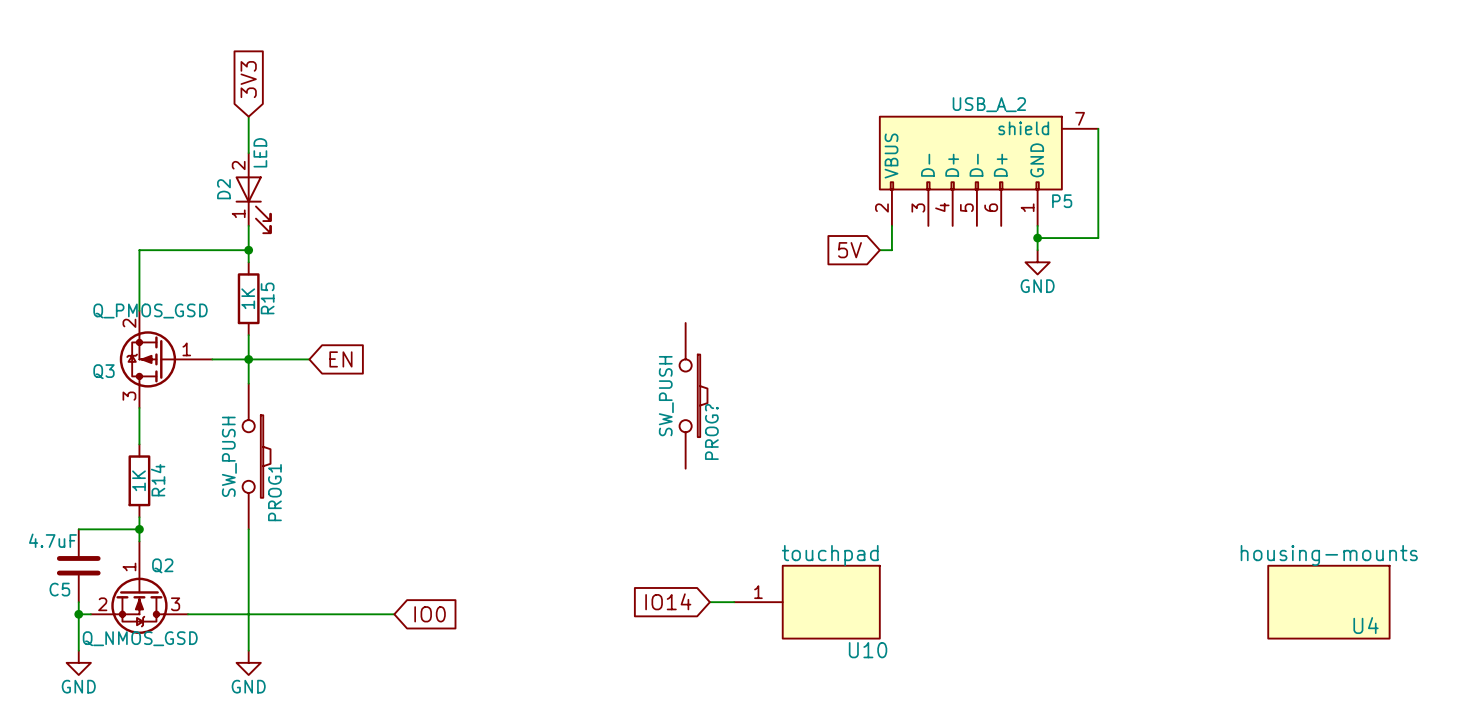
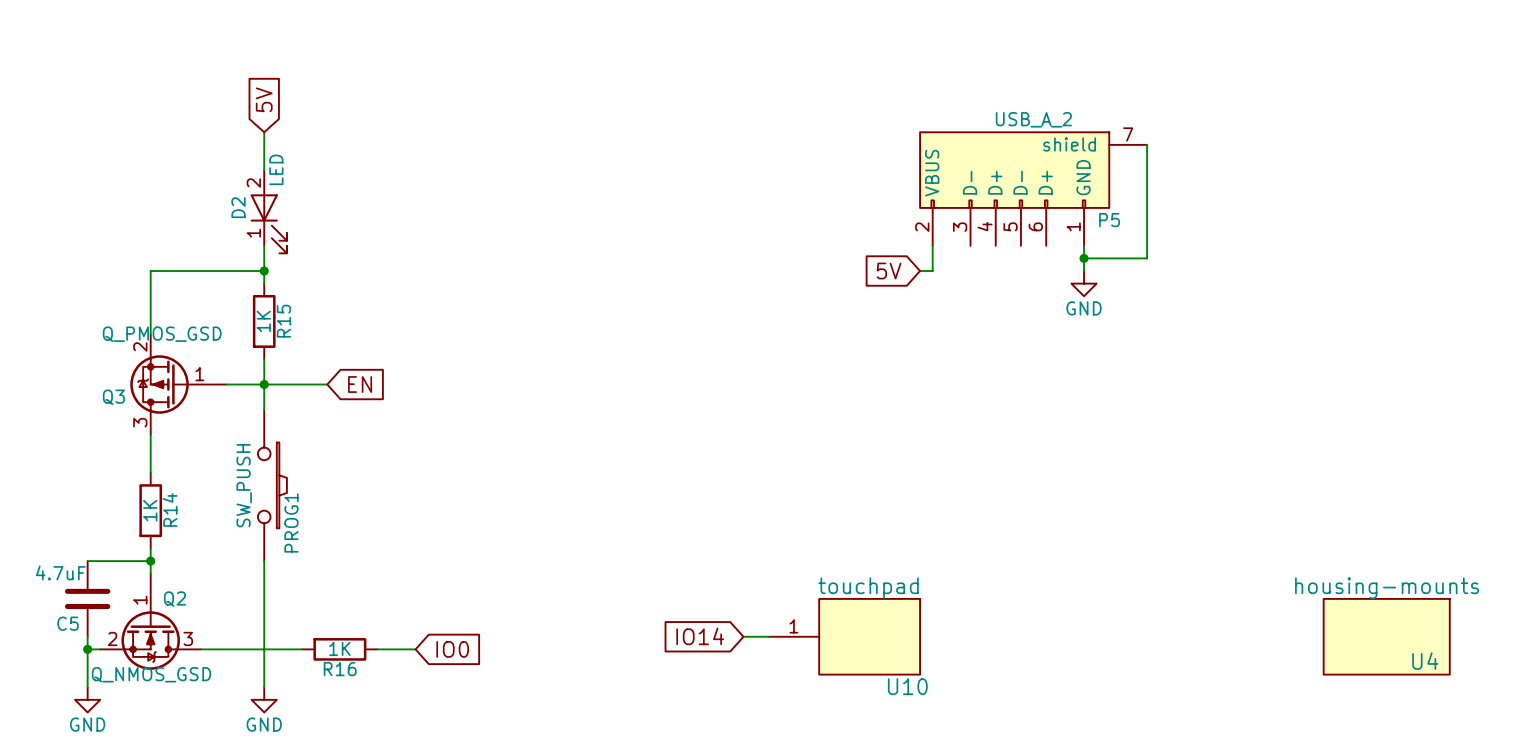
global label: 3V3 (248, 79) -> 5V (264, 99)
PROG?: SW_PUSH (693, 395) -> none
wire: (285, 614) (357, 614) -> none
R16: none -> 1K (339, 649)

